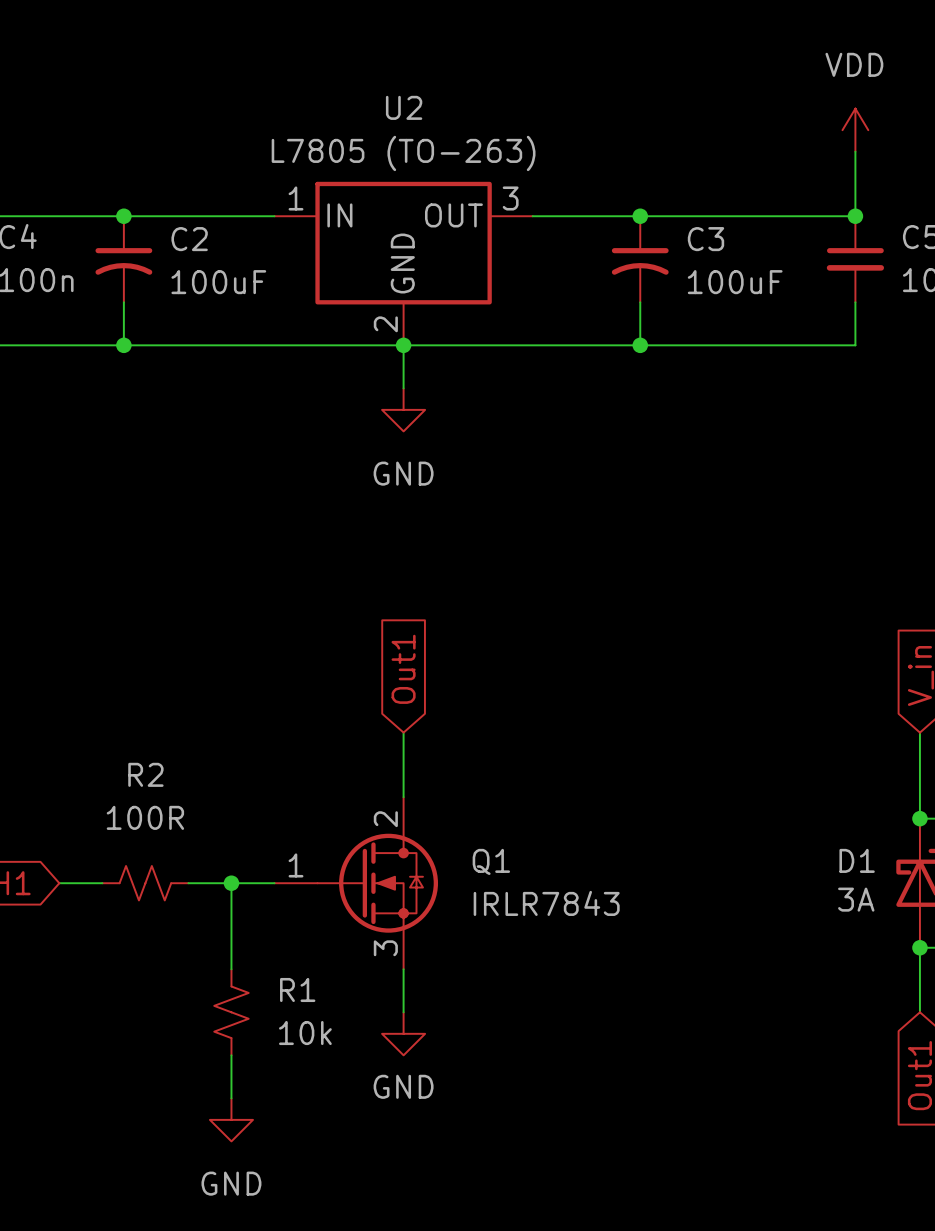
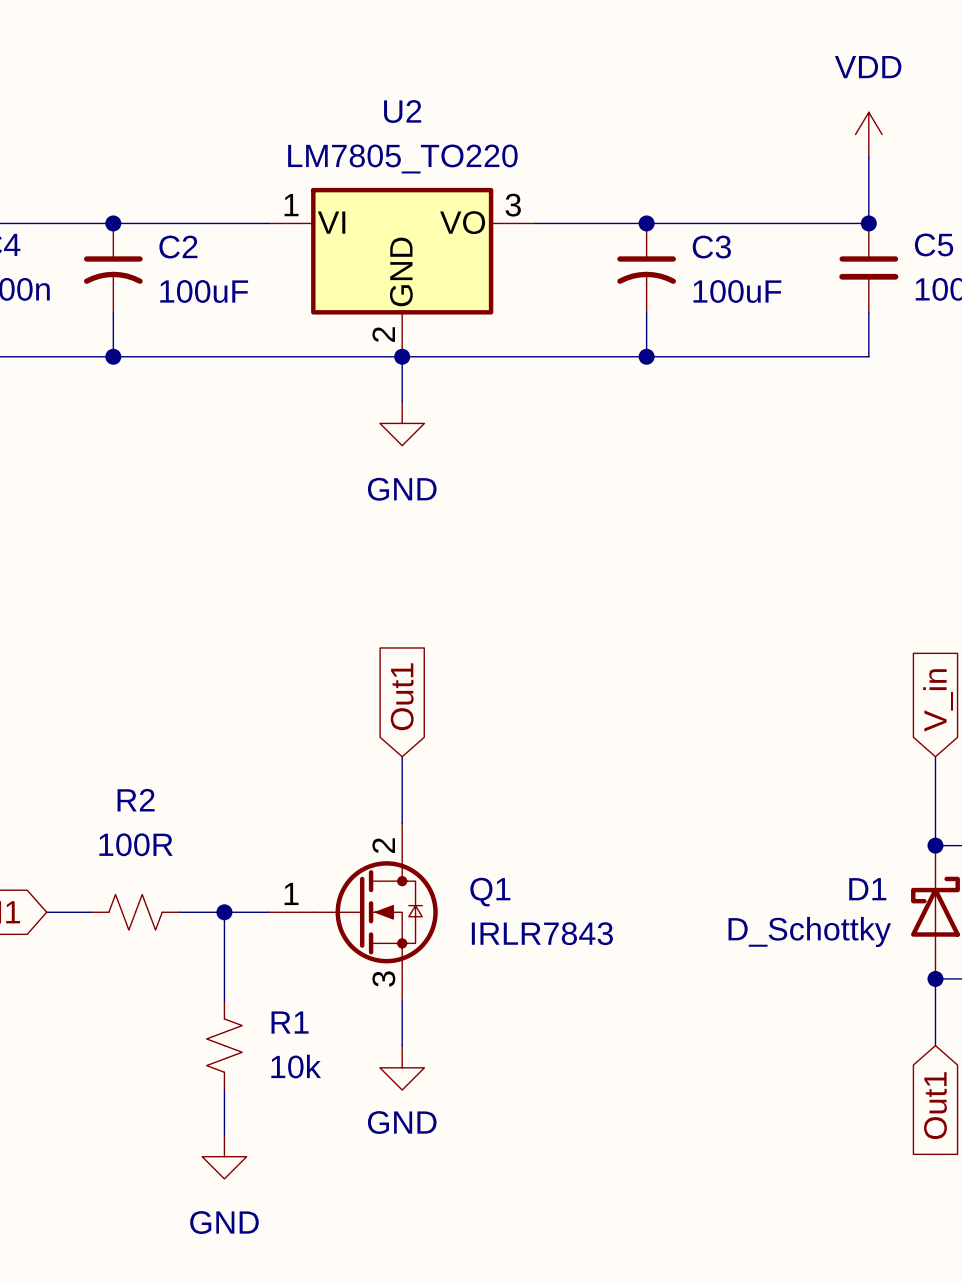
U2 value: L7805 (TO-263) (403, 153) -> LM7805_TO220 (402, 159)
U2 pin name: IN (339, 215) -> VI (331, 222)
U2 pin name: OUT (453, 215) -> VO (462, 222)
D1 value: 3A (856, 899) -> D_Schottky (809, 931)

